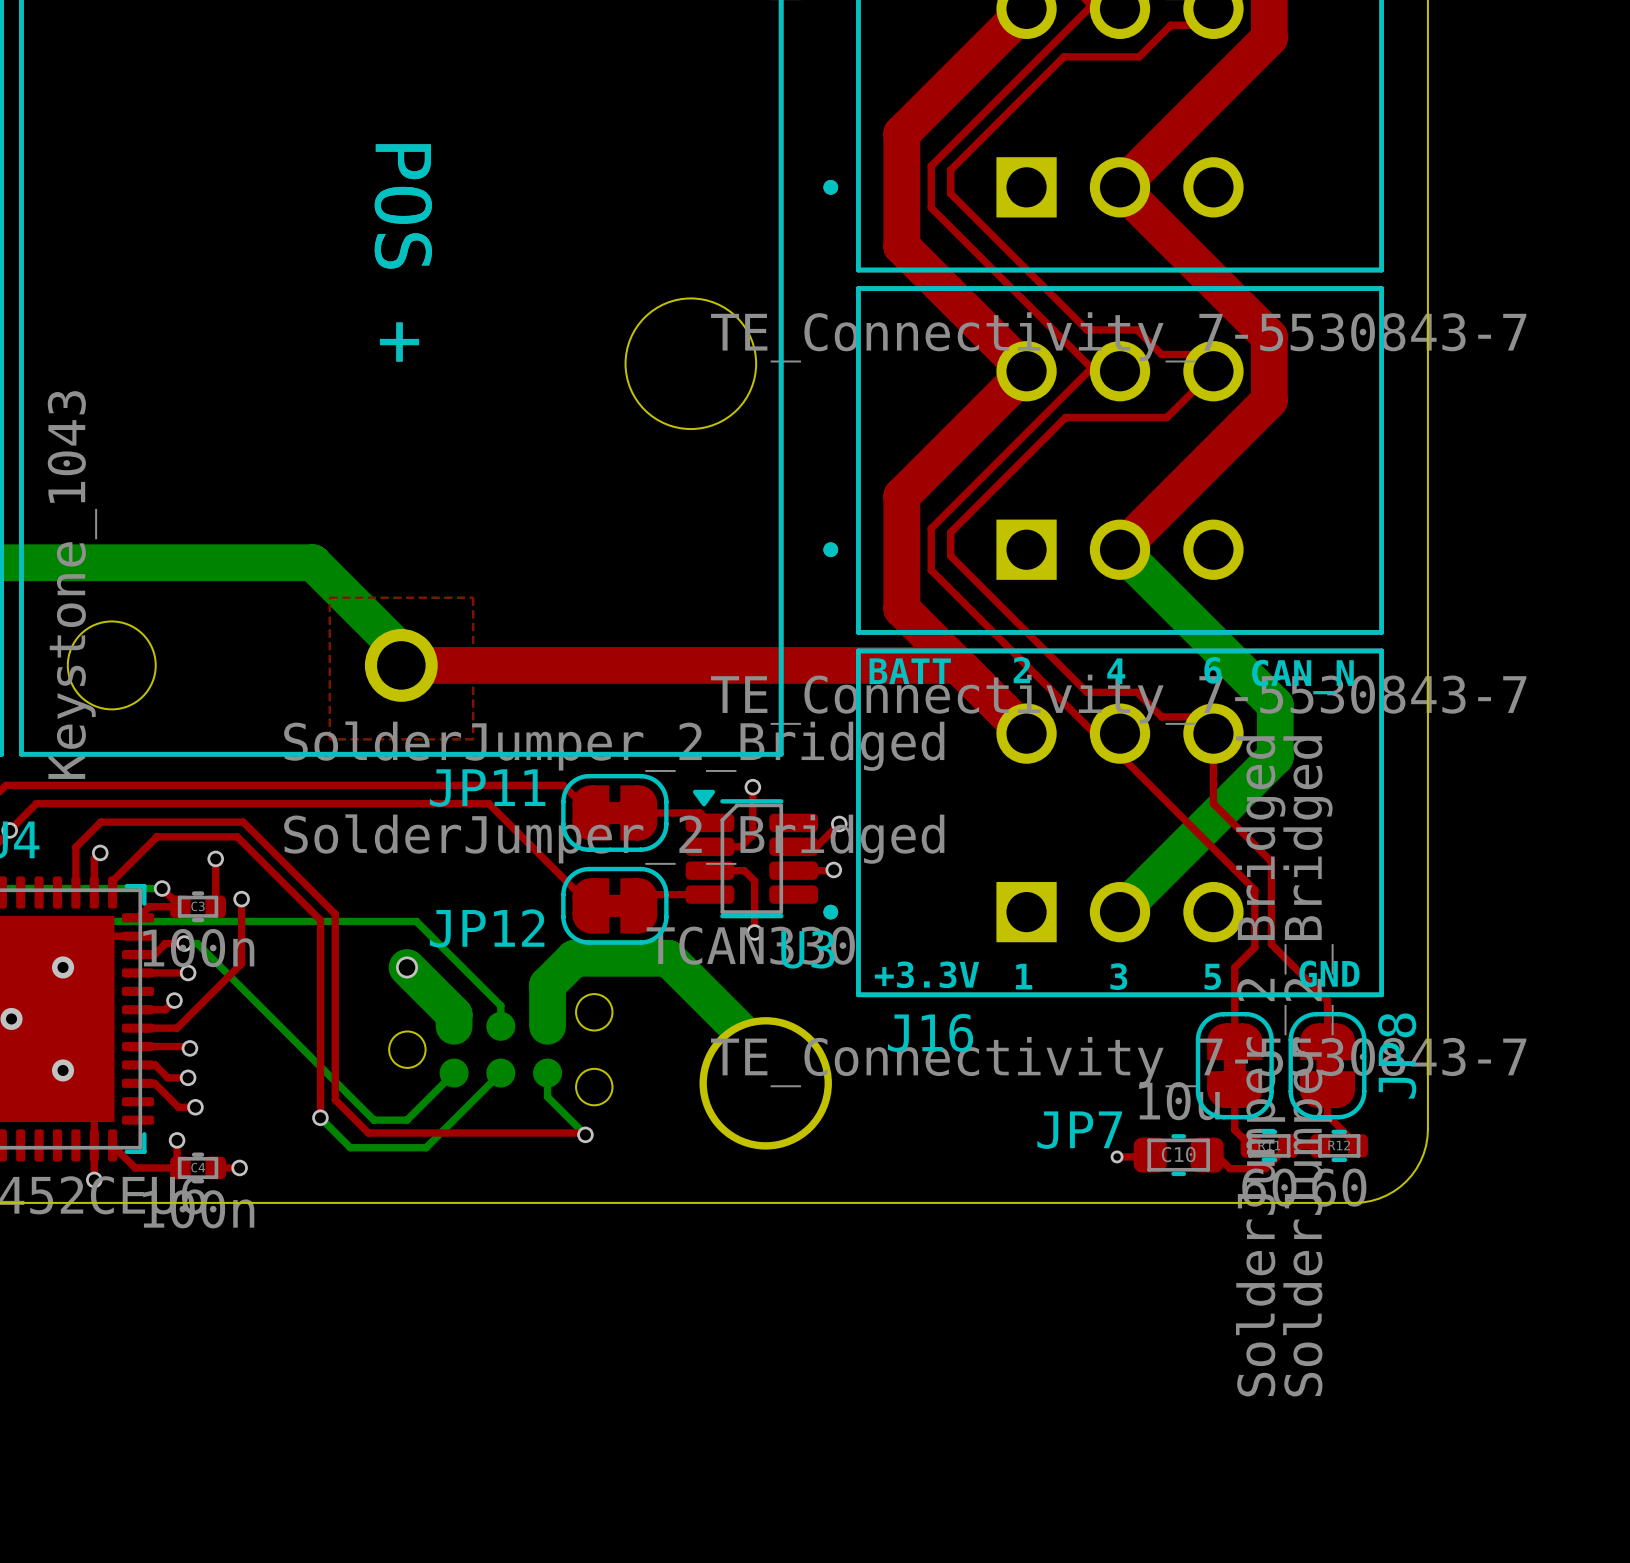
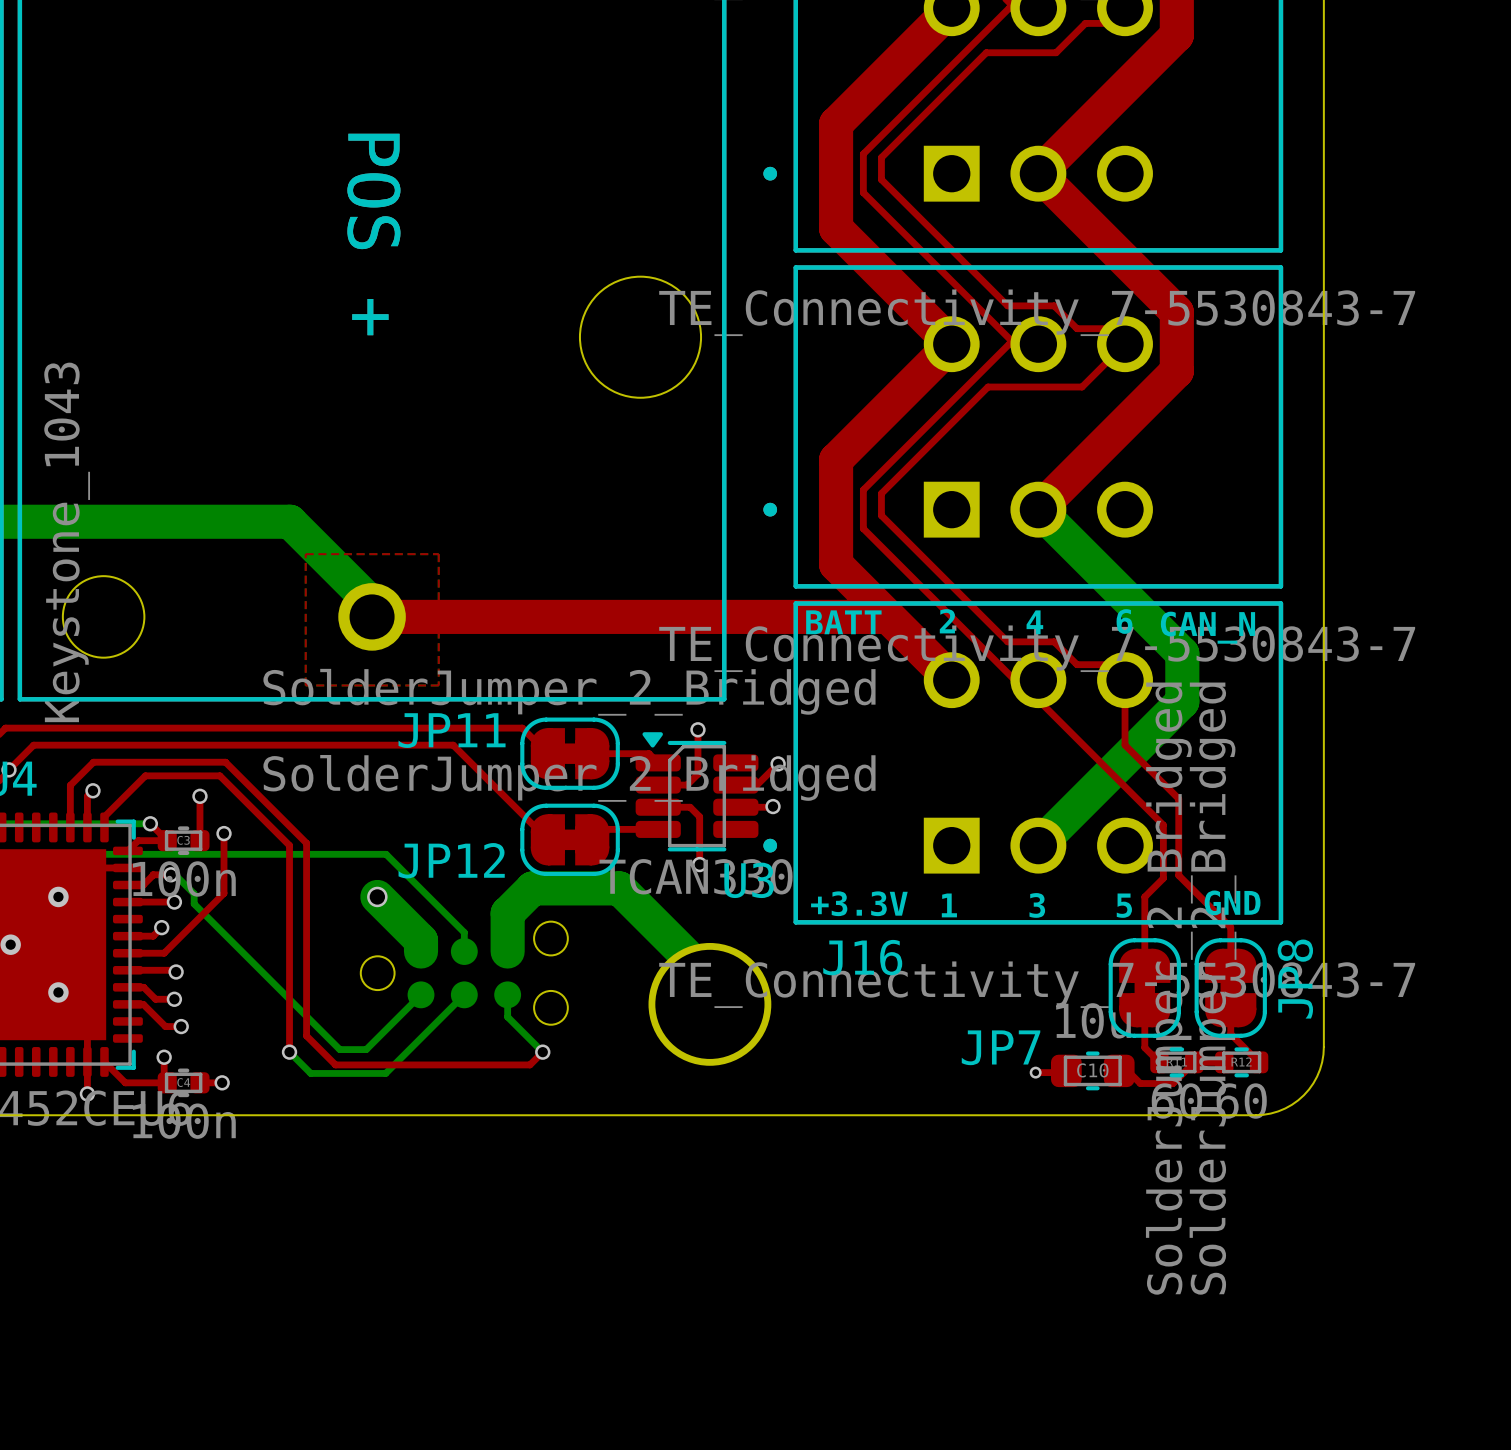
top track: (330, 909) (335, 914) (335, 1099) (368, 1133) (583, 1133) (585, 1134) -> (306, 843) (306, 1035) (335, 1064) (529, 1064) (542, 1052)
top track: (312, 911) (320, 920) (320, 1117) -> (289, 845) (289, 1052)
bottom track: (188, 943) (197, 943) (373, 1120) (407, 1120) -> (175, 874) (194, 893) (194, 903) (339, 1049) (366, 1049) (377, 1038)
bottom track: (320, 1117) (350, 1147) (426, 1147) -> (289, 1052) (310, 1073) (385, 1073) (395, 1064)
via position: (320, 1117) -> (289, 1052)

